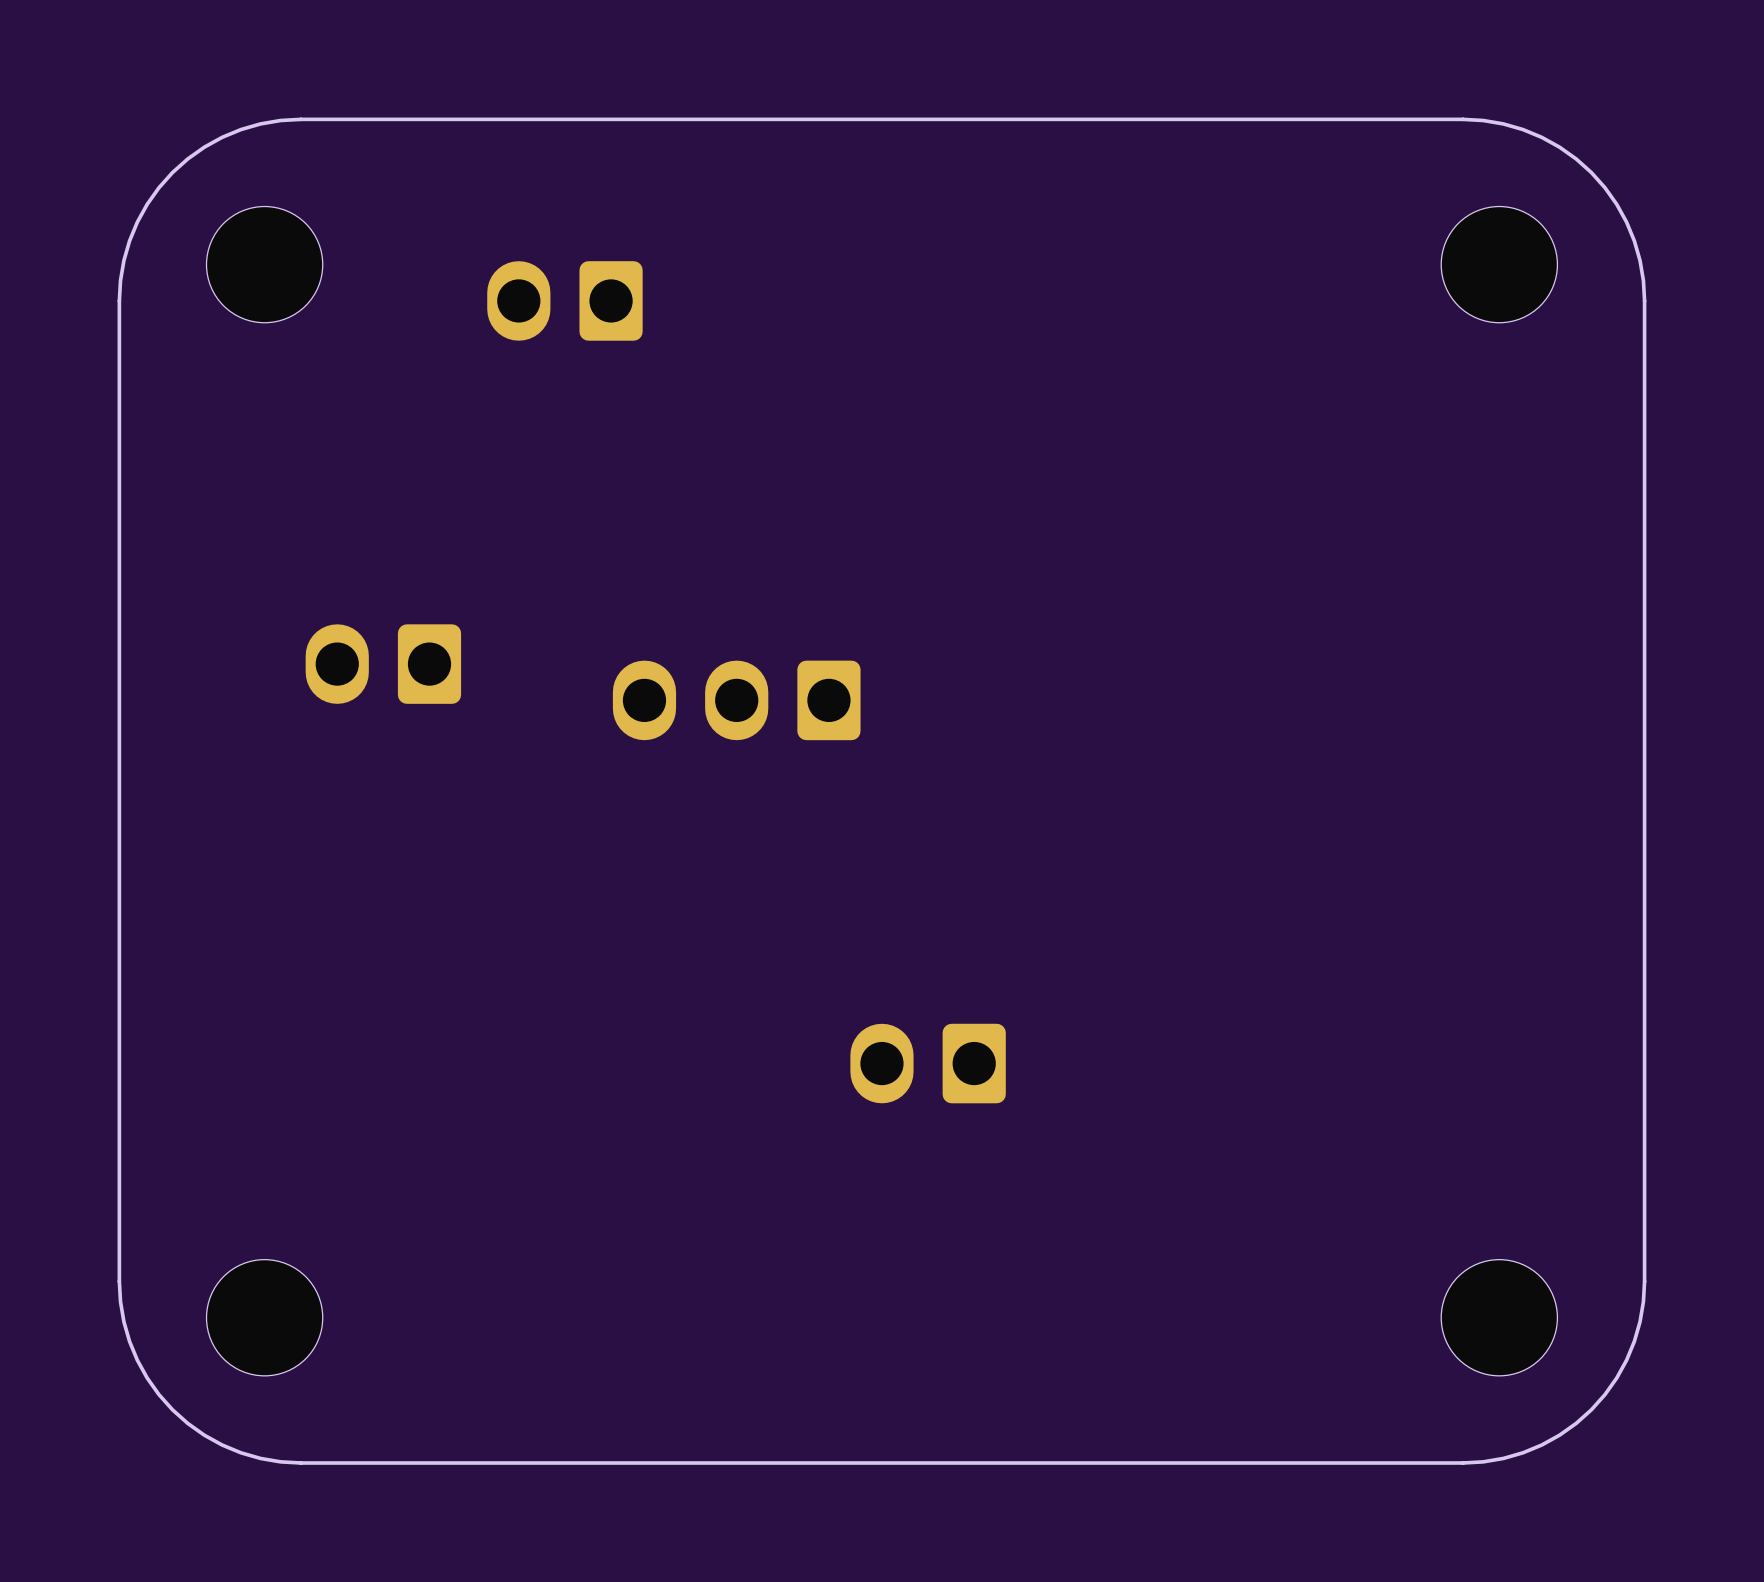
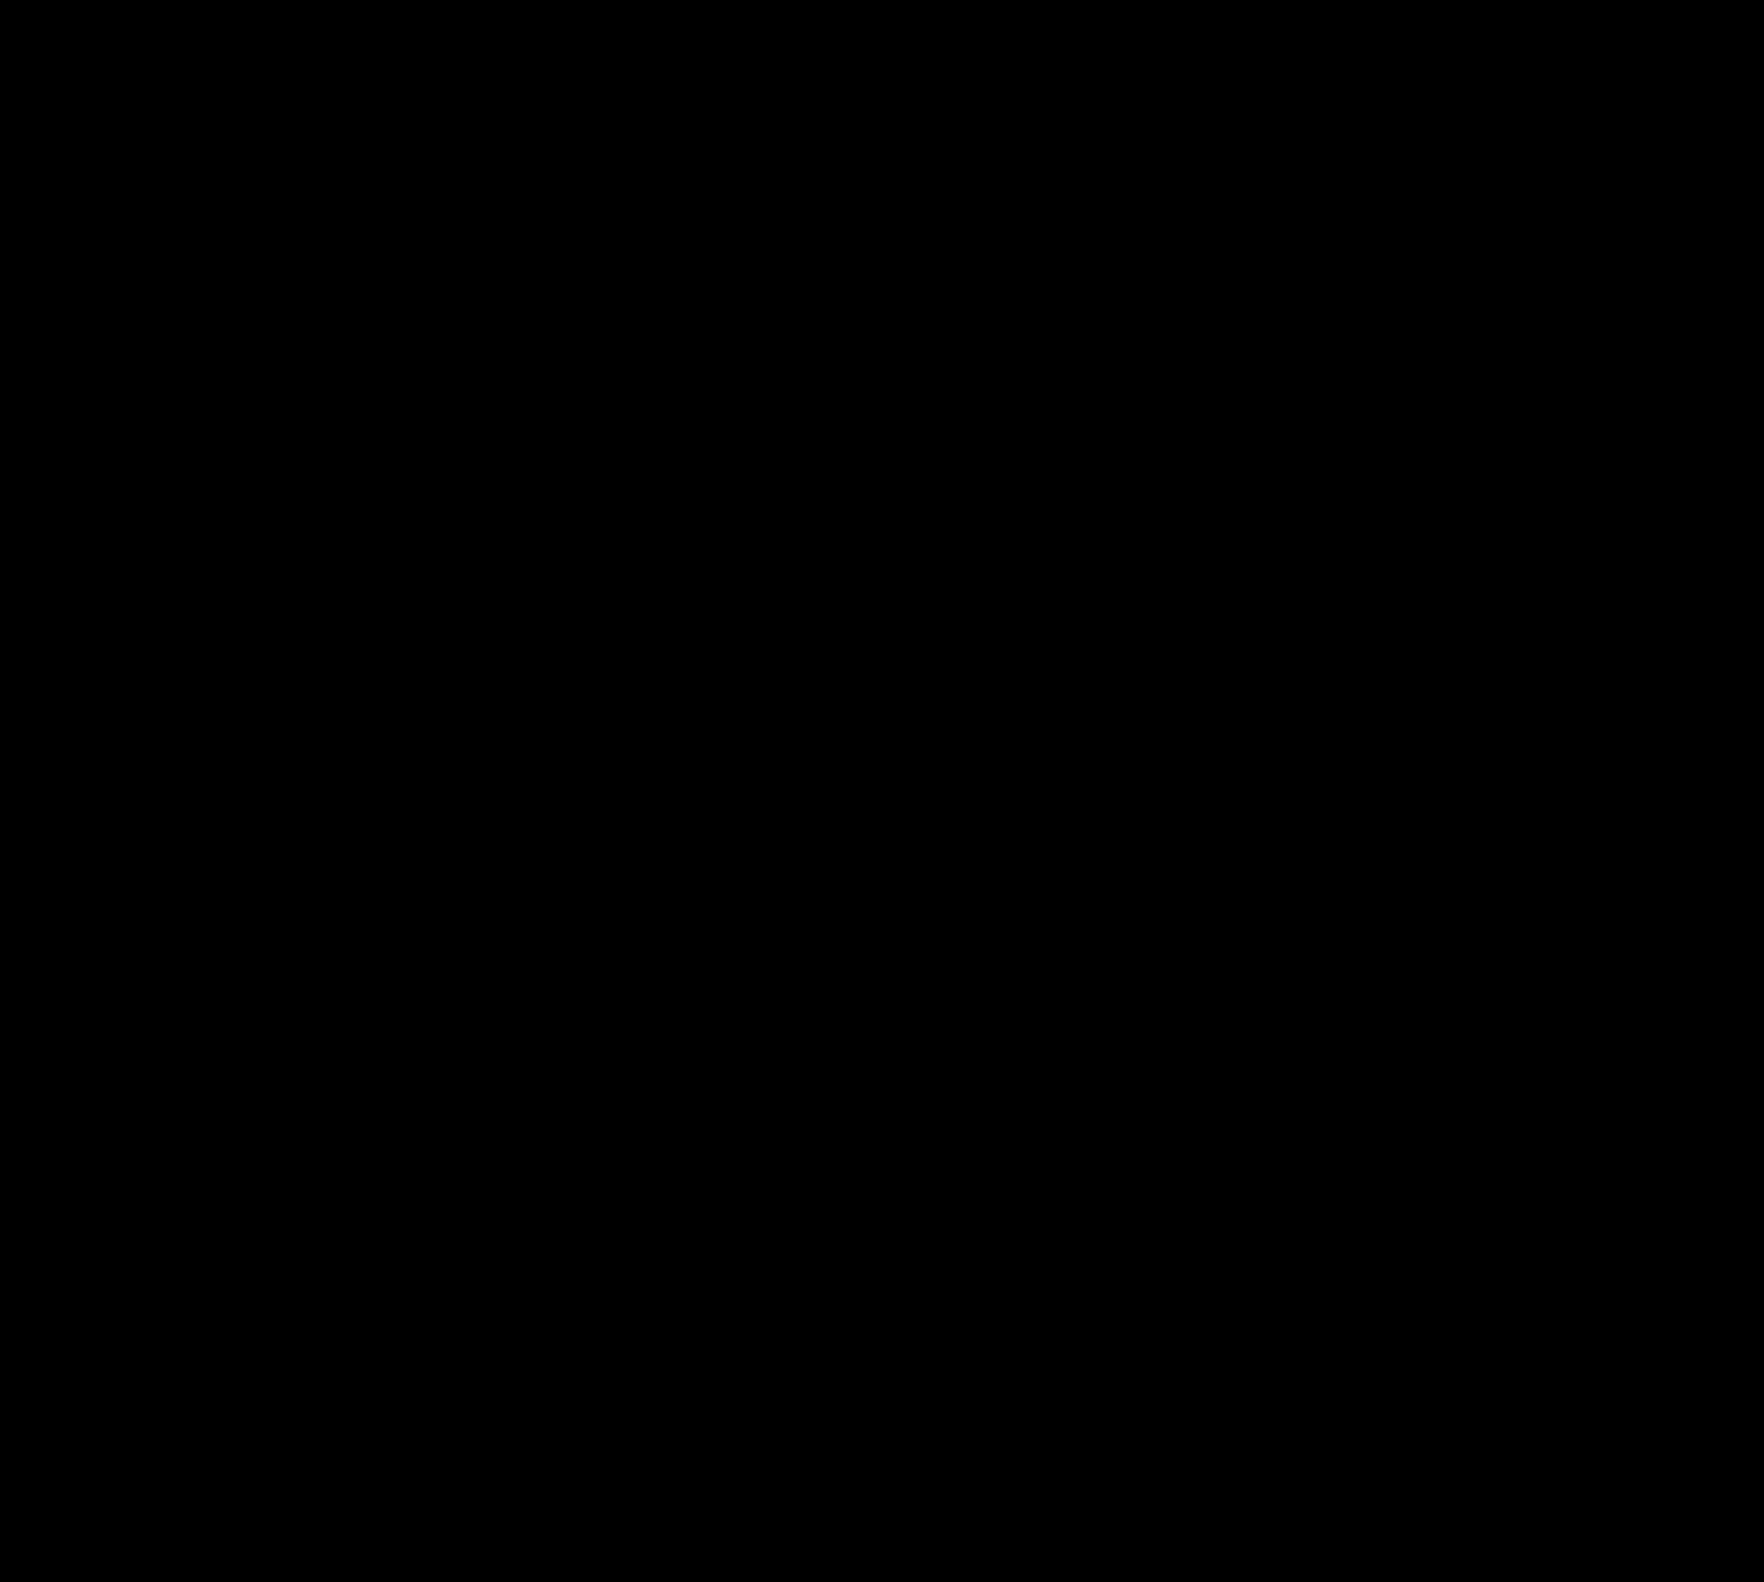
board edge: (1463, 119) (300, 119) (260, 123) (240, 129) (204, 147) (172, 172) (158, 187) (137, 222) (123, 260) (119, 300) (119, 1281) (123, 1321) (129, 1341) (147, 1378) (172, 1409) (204, 1435) (240, 1452) (280, 1461) (300, 1463) (1463, 1463) (1503, 1458) (1541, 1445) (1576, 1423) (1591, 1409) (1616, 1378) (1634, 1341) (1643, 1301) (1644, 1281) (1643, 280) (1640, 260) (1626, 222) (1604, 187) (1576, 158) (1559, 147) (1522, 129) (1483, 120) (1463, 119) -> none
part: (264, 264) -> none
part: (1499, 264) -> none
part: (564, 300) -> none
part: (383, 664) -> none
part: (736, 700) -> none
part: (928, 1063) -> none
part: (264, 1317) -> none
part: (1499, 1317) -> none

